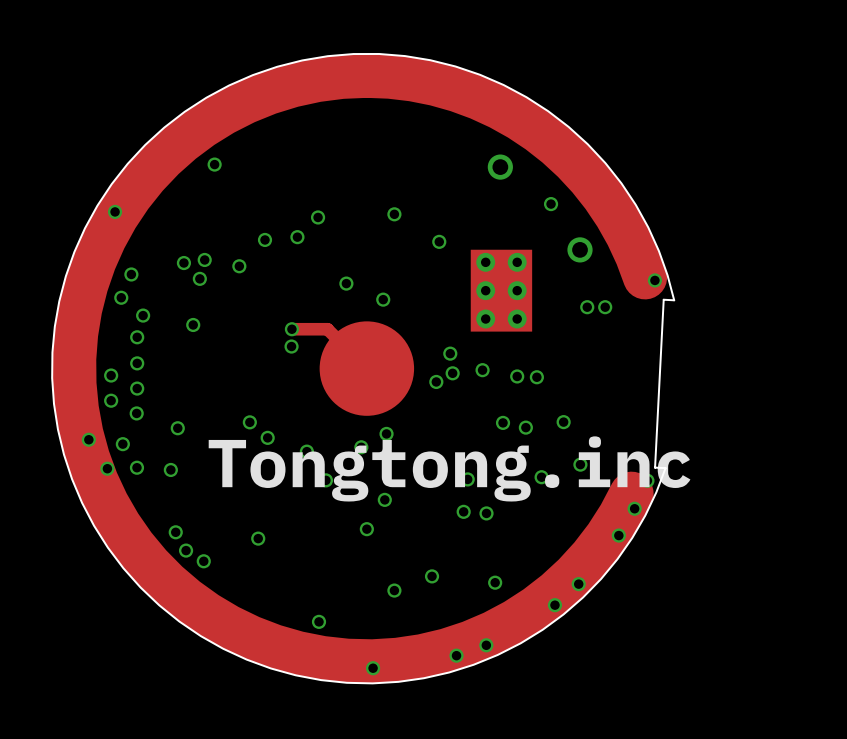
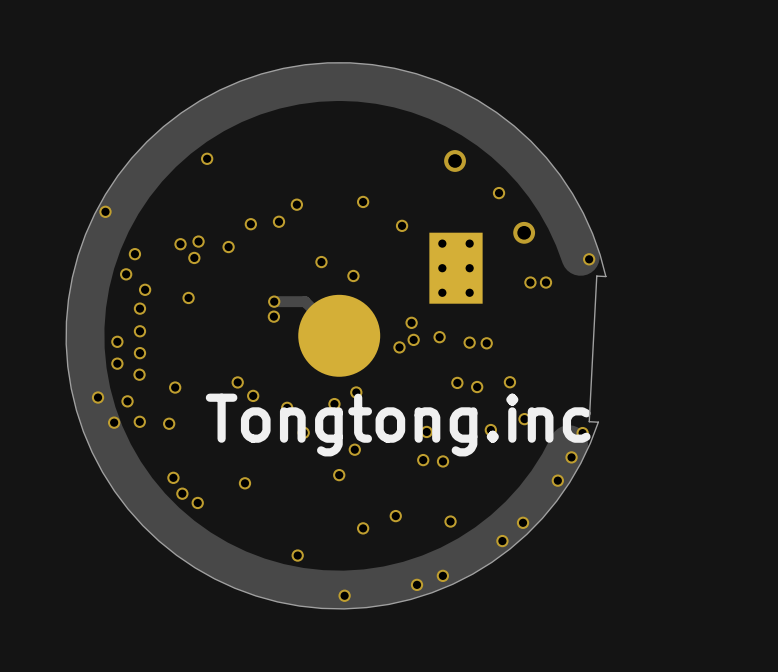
via position: (115, 211) -> (105, 211)

